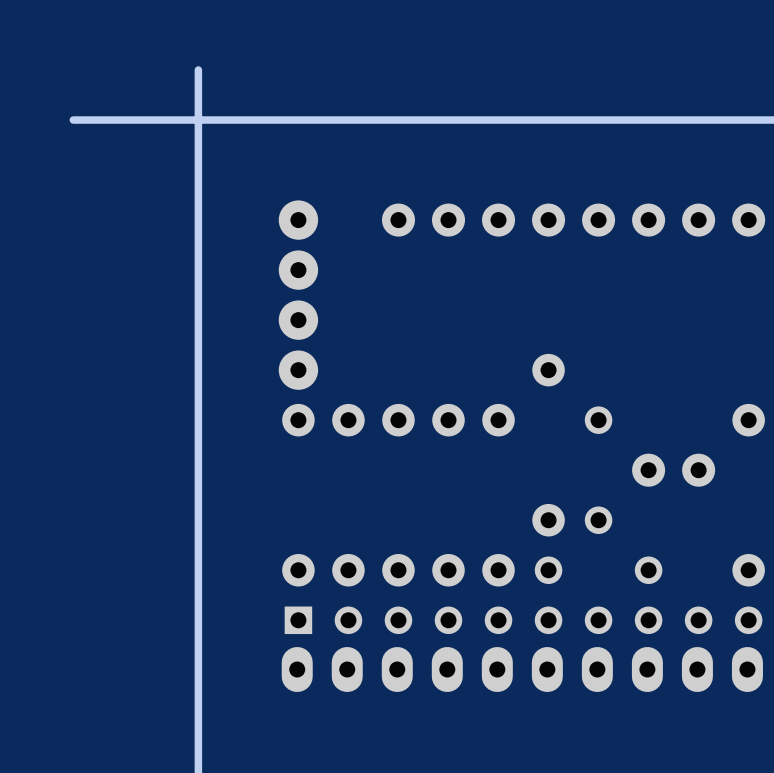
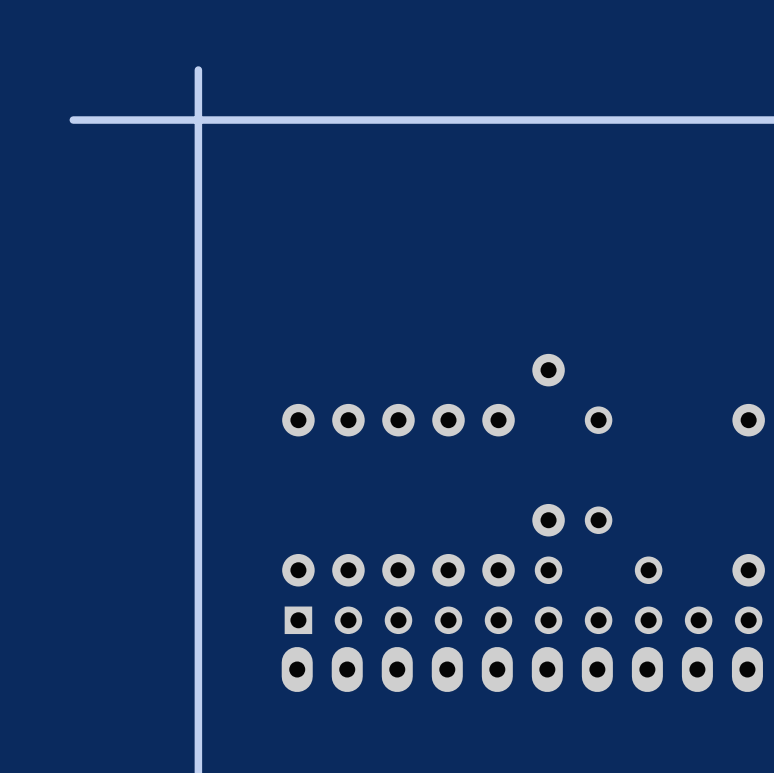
part: (423, 220) -> none
part: (523, 220) -> none
part: (623, 220) -> none
part: (723, 220) -> none
part: (298, 295) -> none
part: (673, 470) -> none

